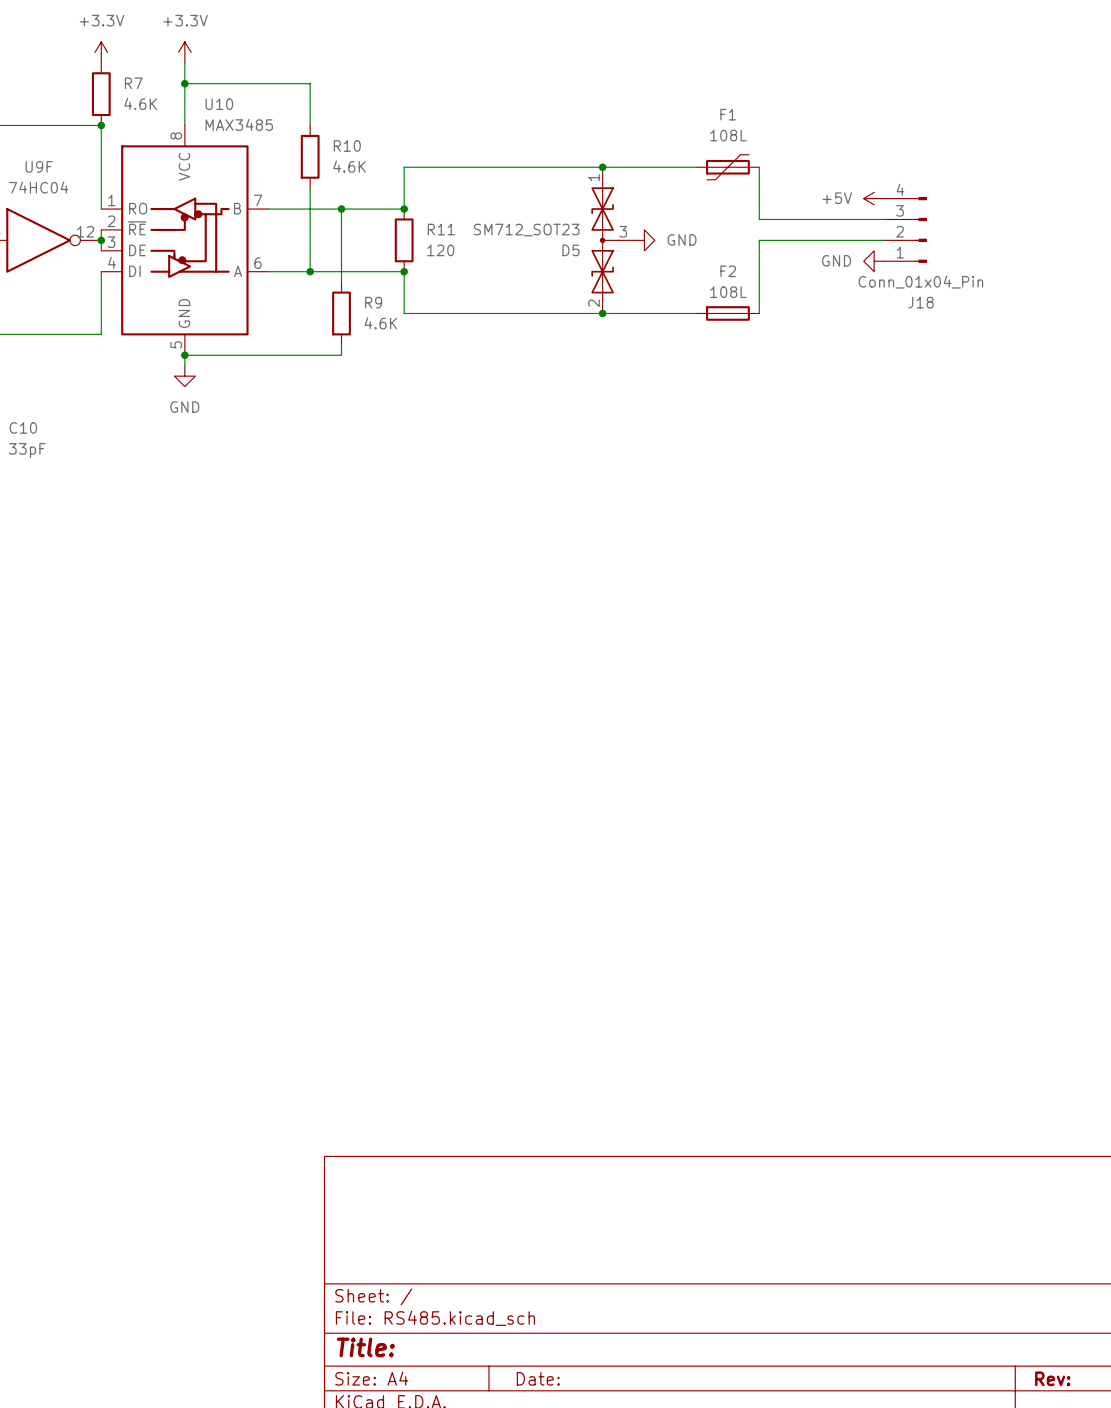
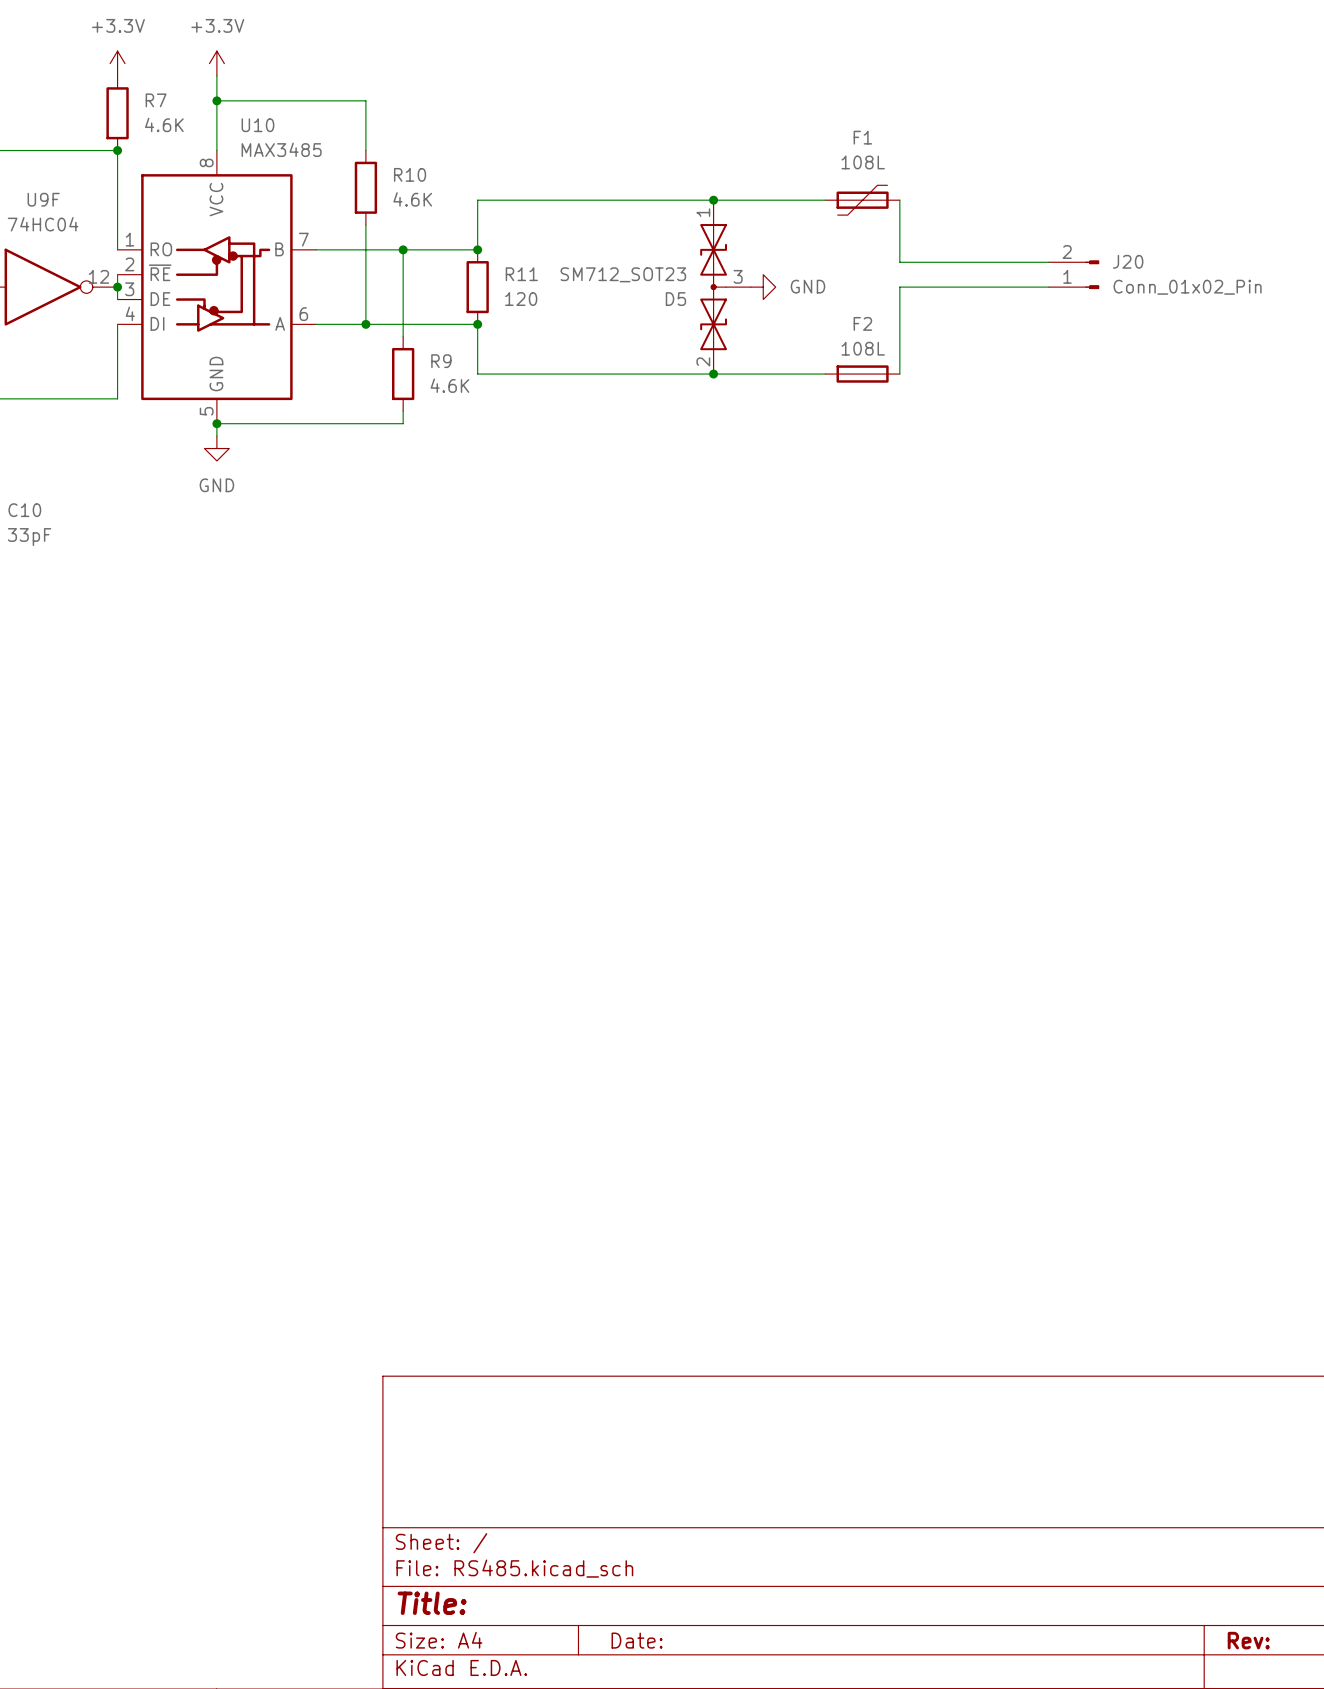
power symbol: +5V (874, 198) -> none
J18: Conn_01x04_Pin (905, 229) -> none
J20: none -> Conn_01x02_Pin (1074, 274)
power symbol: GND (874, 261) -> none

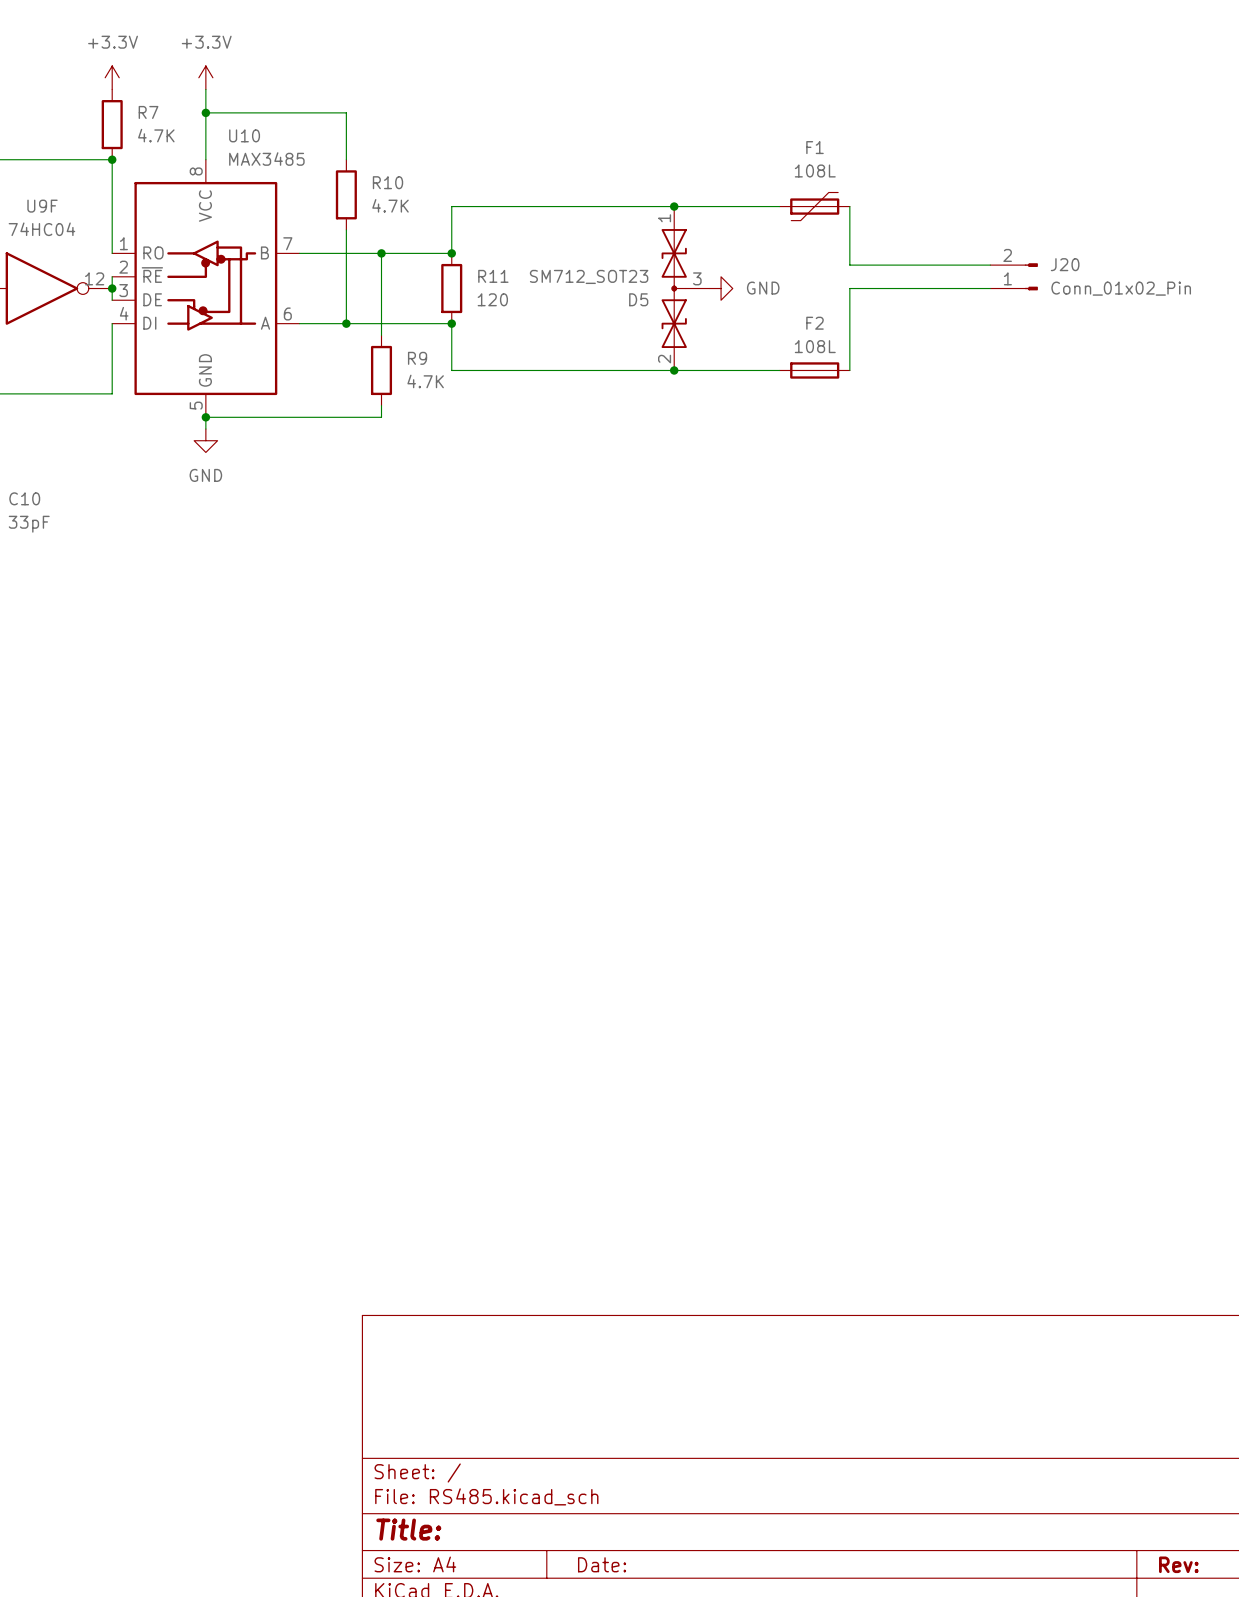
R7 value: 4.6K (164, 124) -> 4.7K (156, 135)
R10 value: 4.6K (412, 199) -> 4.7K (390, 205)
R9 value: 4.6K (449, 385) -> 4.7K (425, 381)

